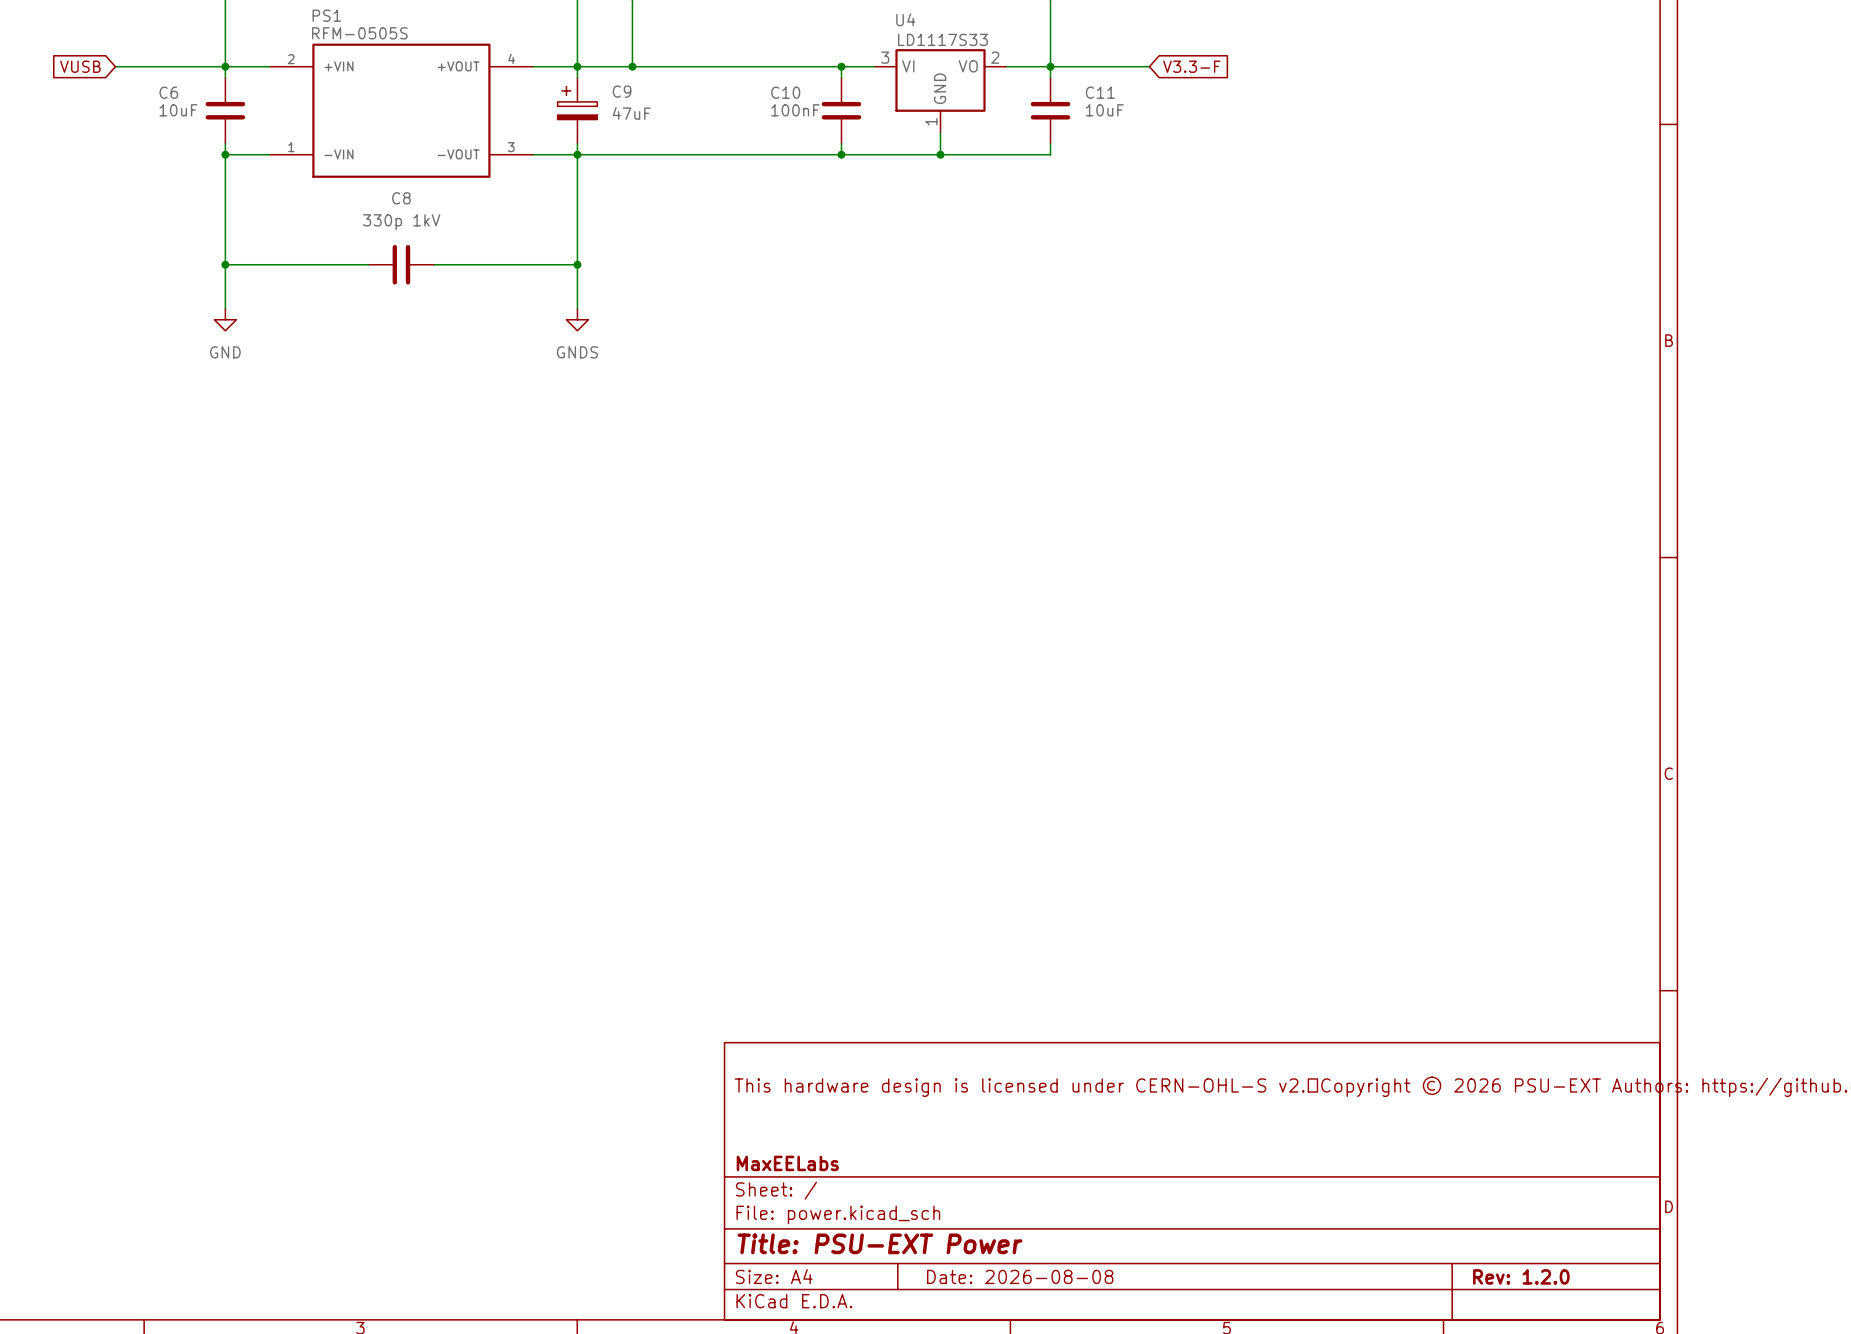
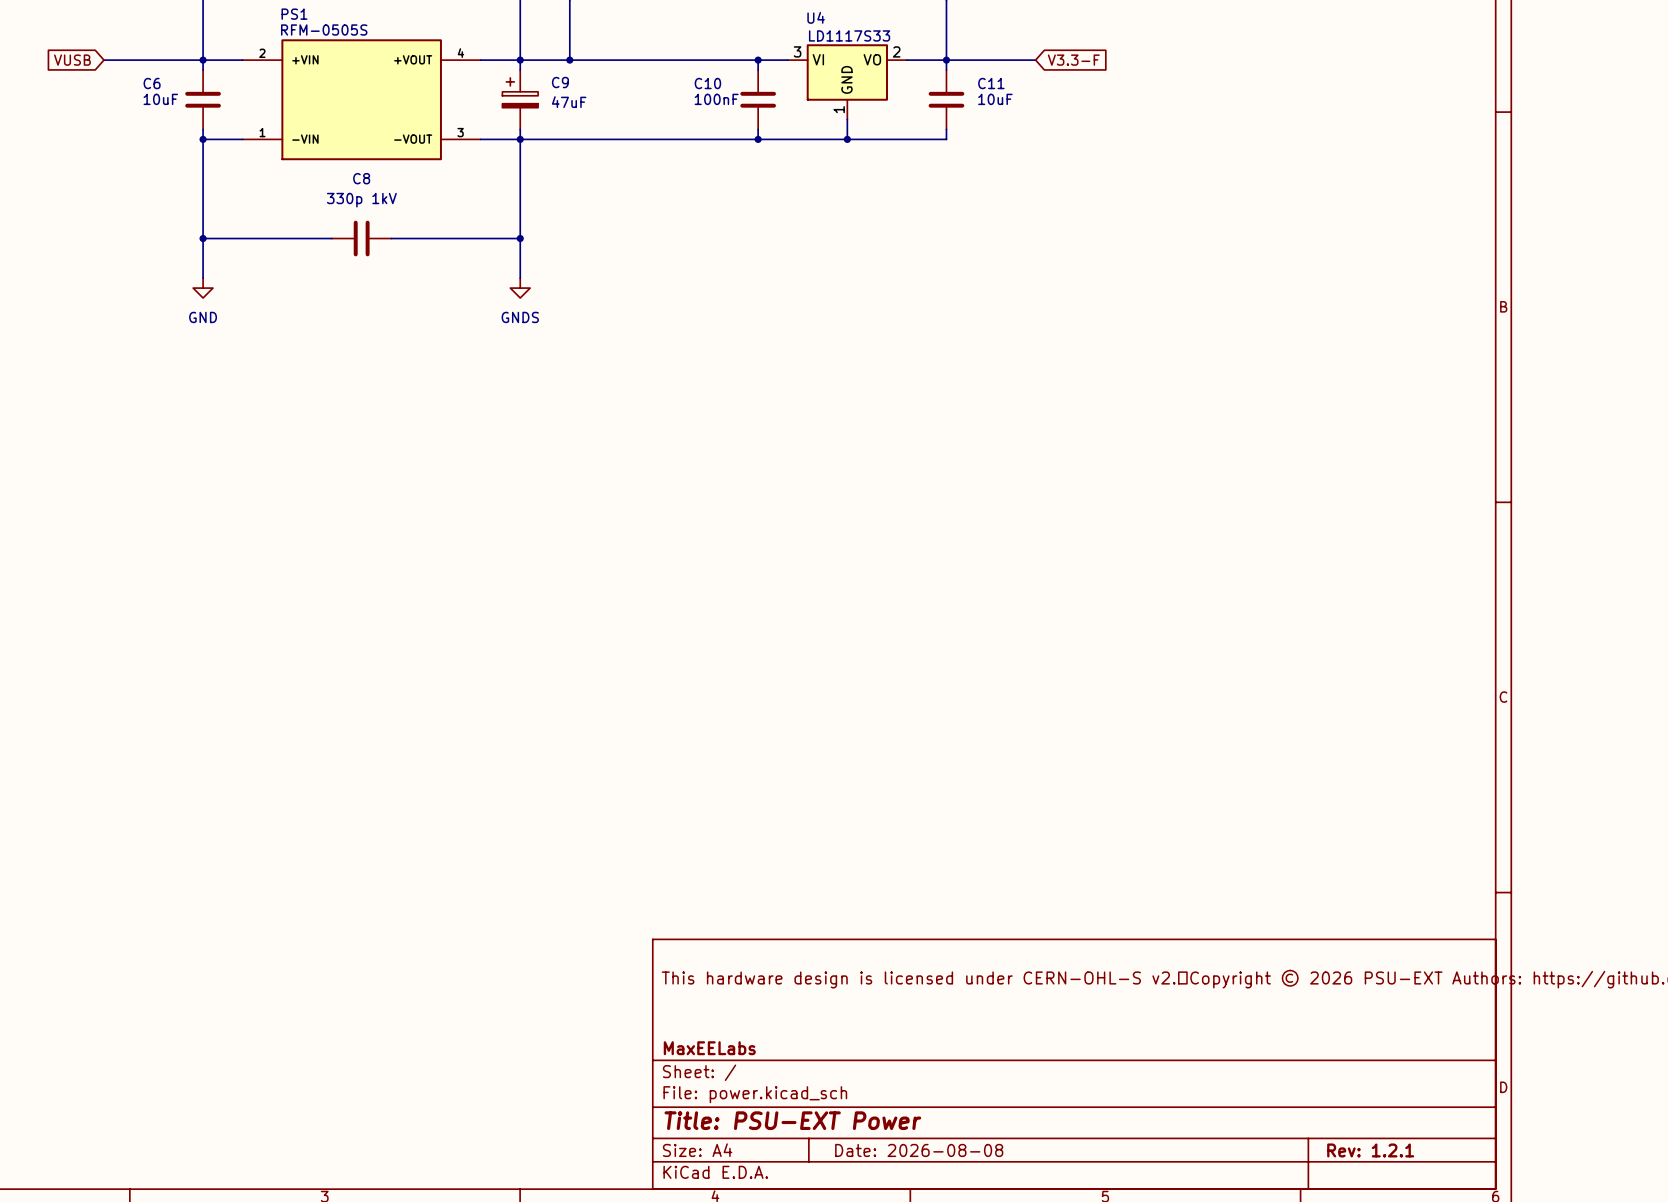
title block: Rev: 1.2.0 (1521, 1276) -> Rev: 1.2.1 (1370, 1150)

